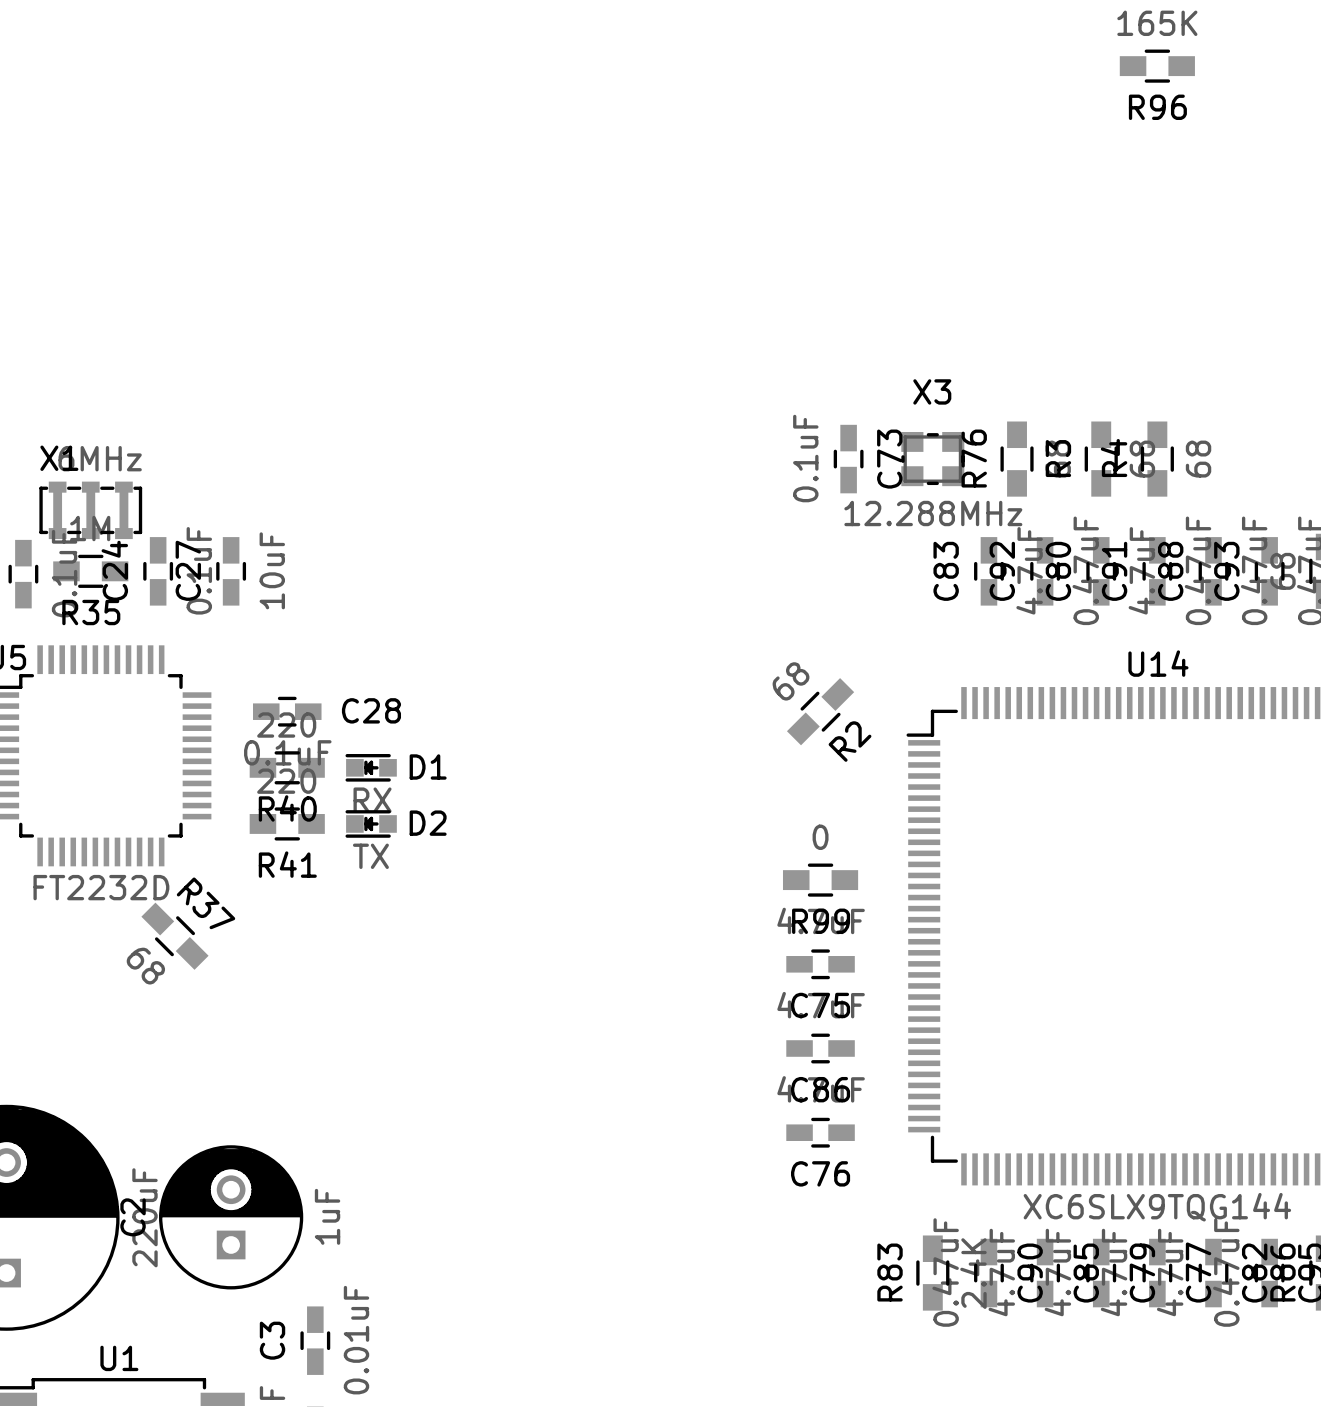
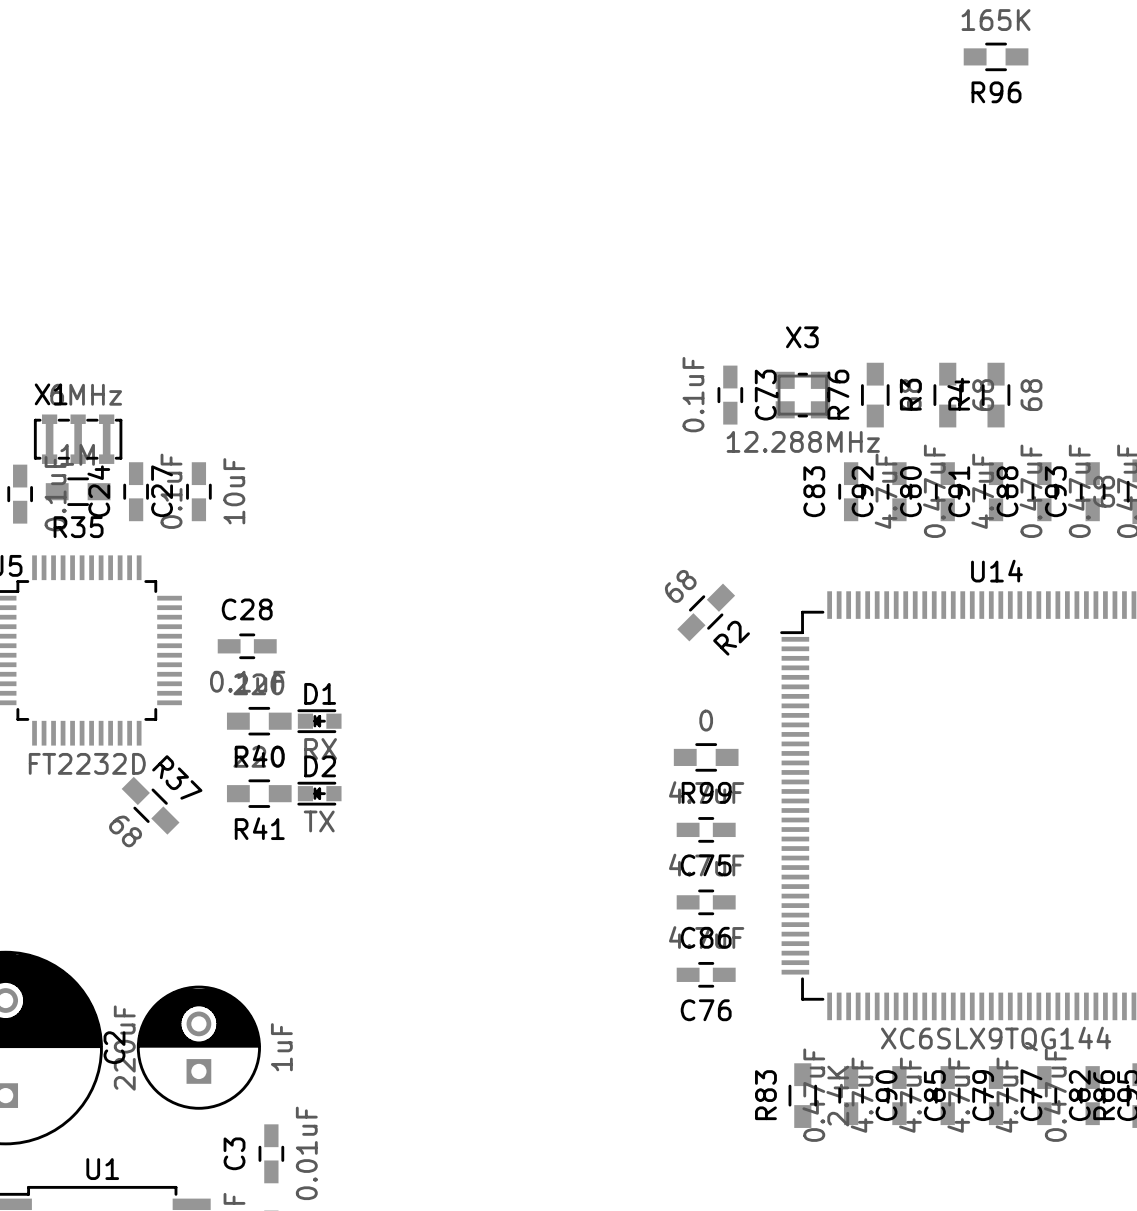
C28 name position: C28 (371, 710) -> C28 (247, 609)
C28 position: (287, 711) -> (247, 646)
D1 name position: D1 (428, 766) -> D1 (320, 693)
R40 position: (287, 767) -> (259, 721)
D1 position: (371, 767) -> (319, 721)
R41 position: (287, 823) -> (259, 793)
D2 position: (371, 823) -> (319, 793)
D2 name position: D2 (428, 823) -> D2 (320, 766)

